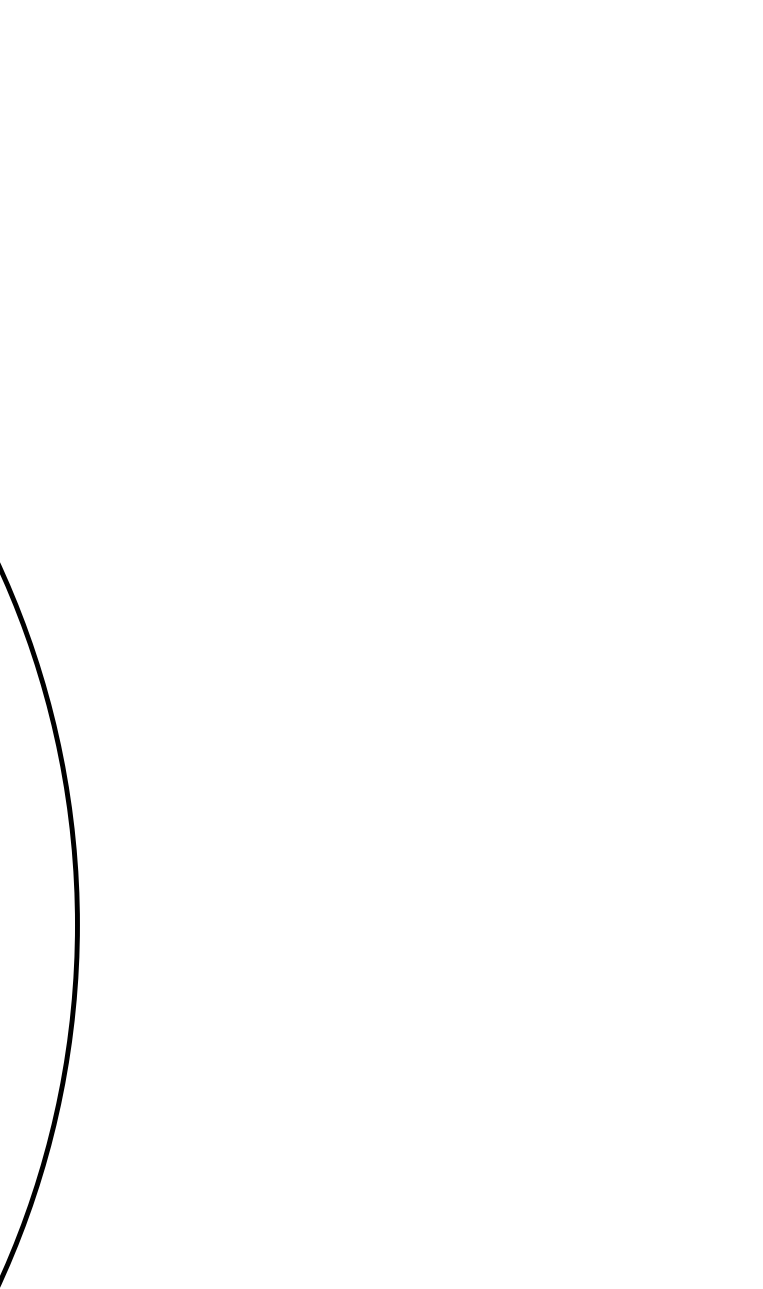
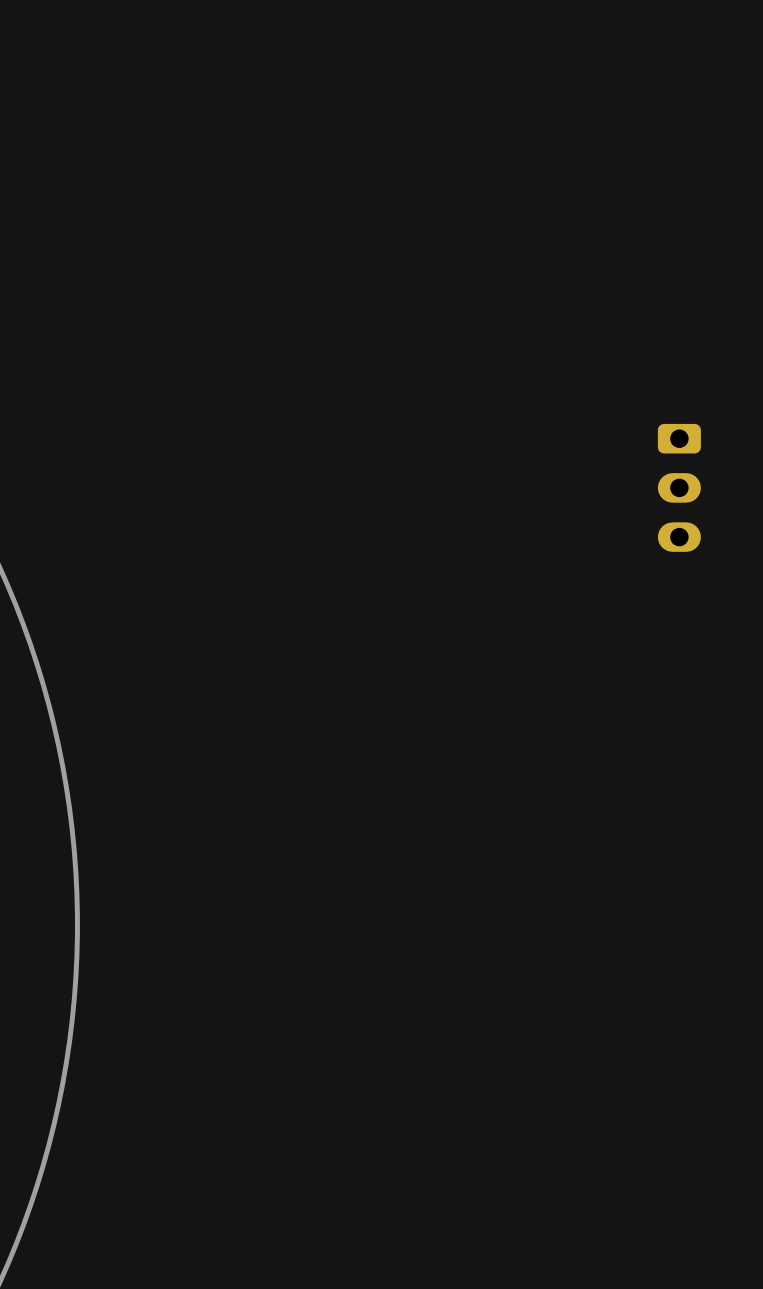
part: none -> (679, 487)

